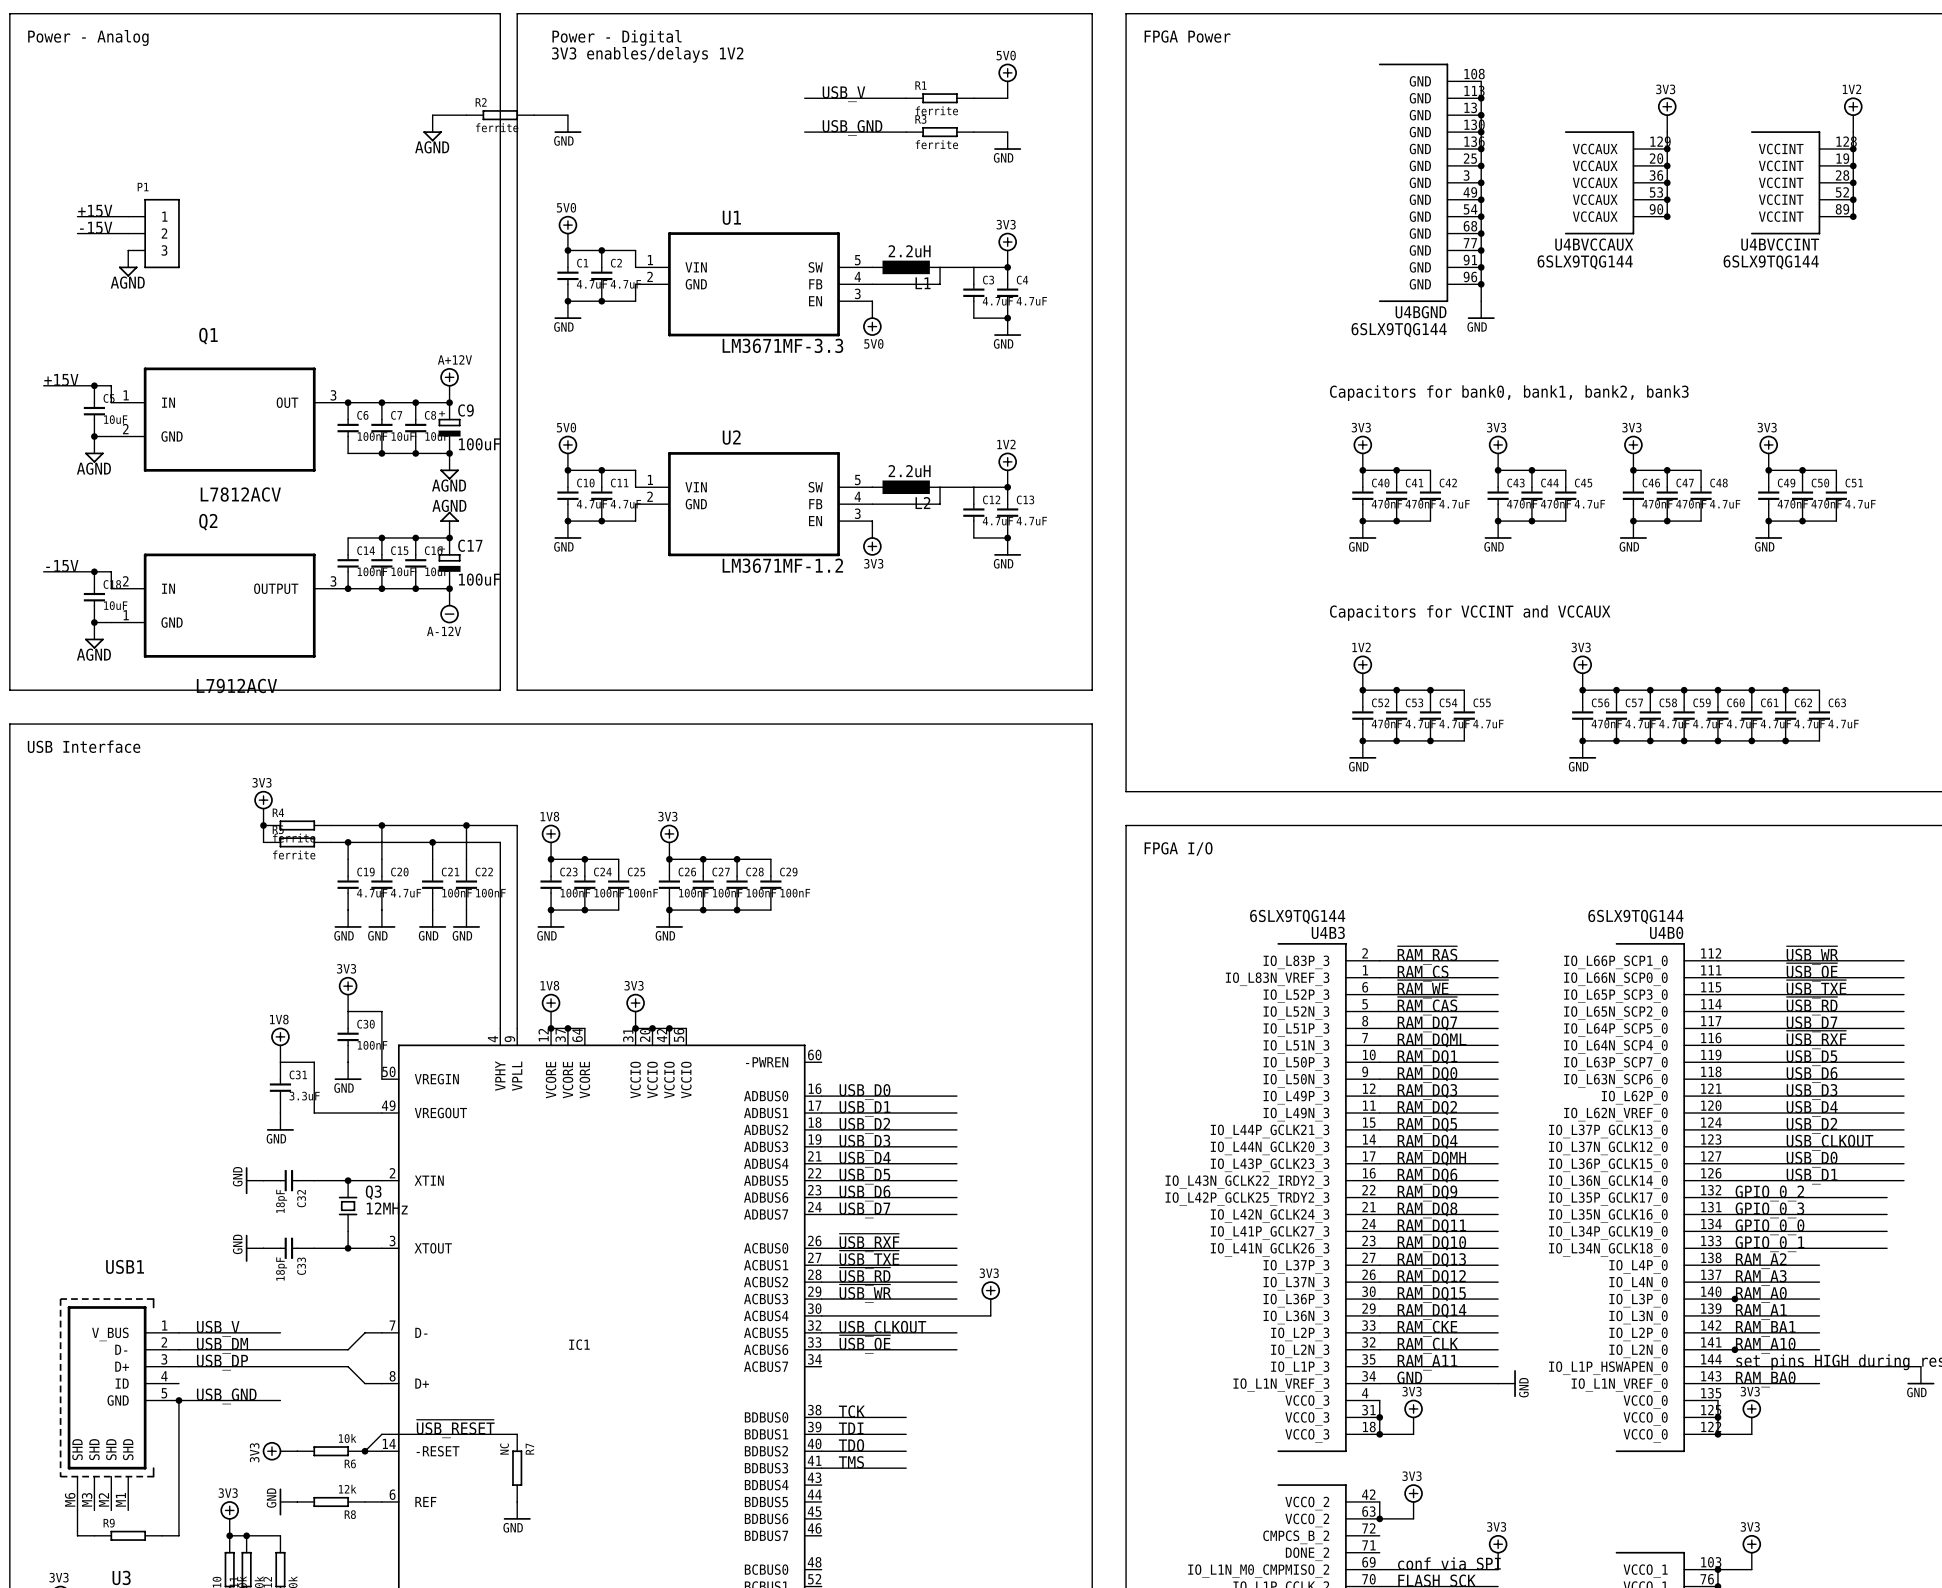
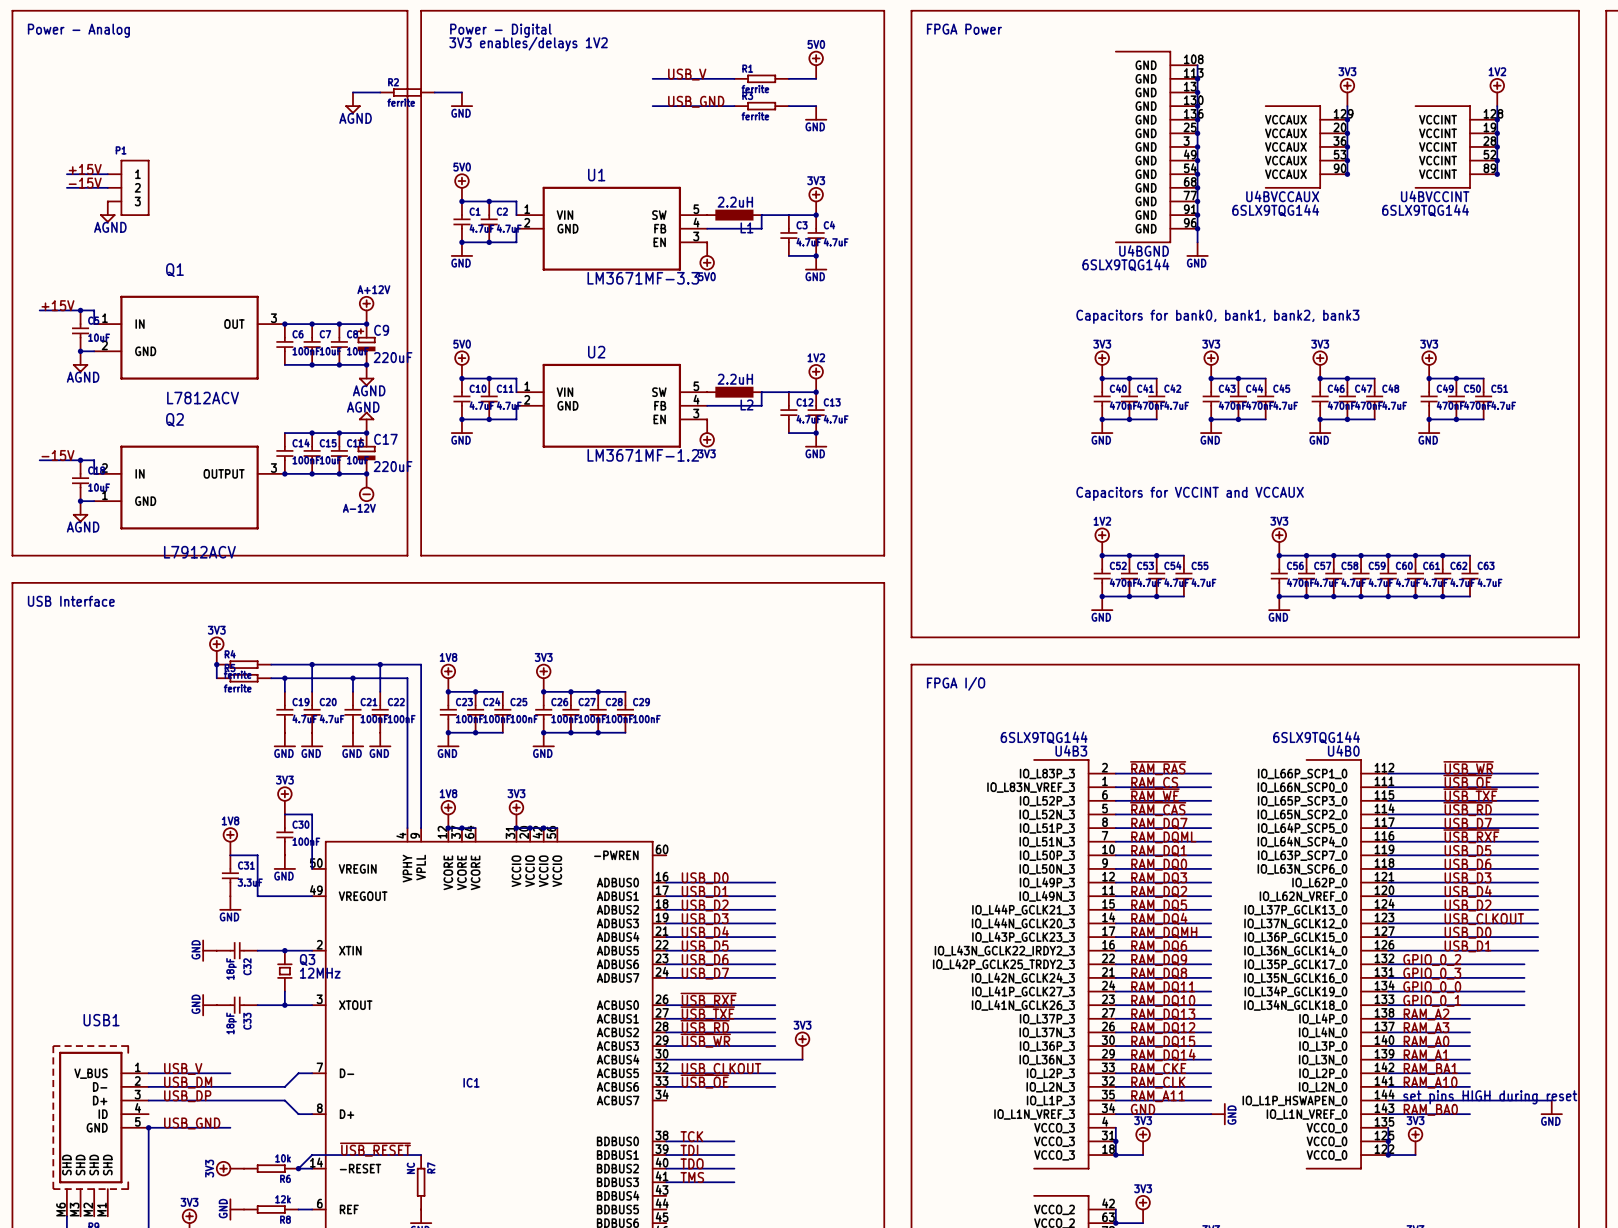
C9 value: 100uF (479, 444) -> 220uF (393, 357)
C17 value: 100uF (479, 579) -> 220uF (393, 466)
junction: (1734, 1299) -> none
junction: (1734, 1349) -> none

